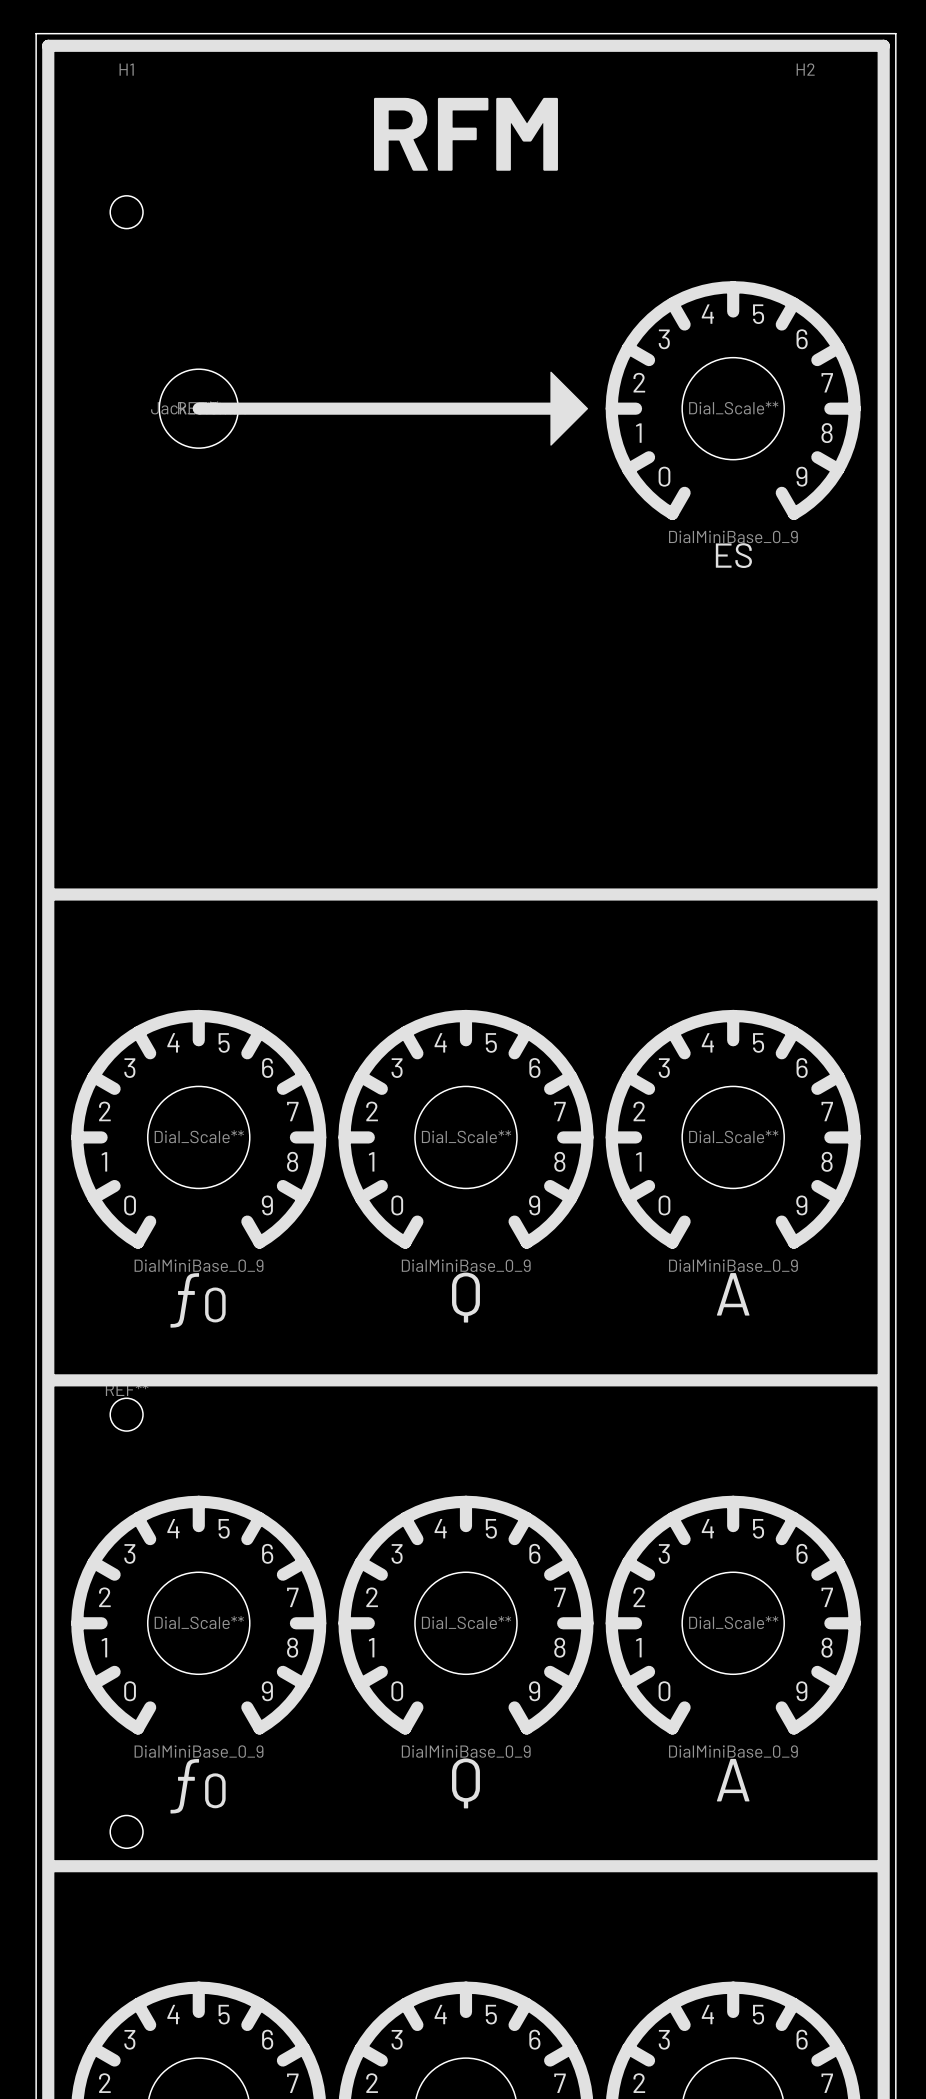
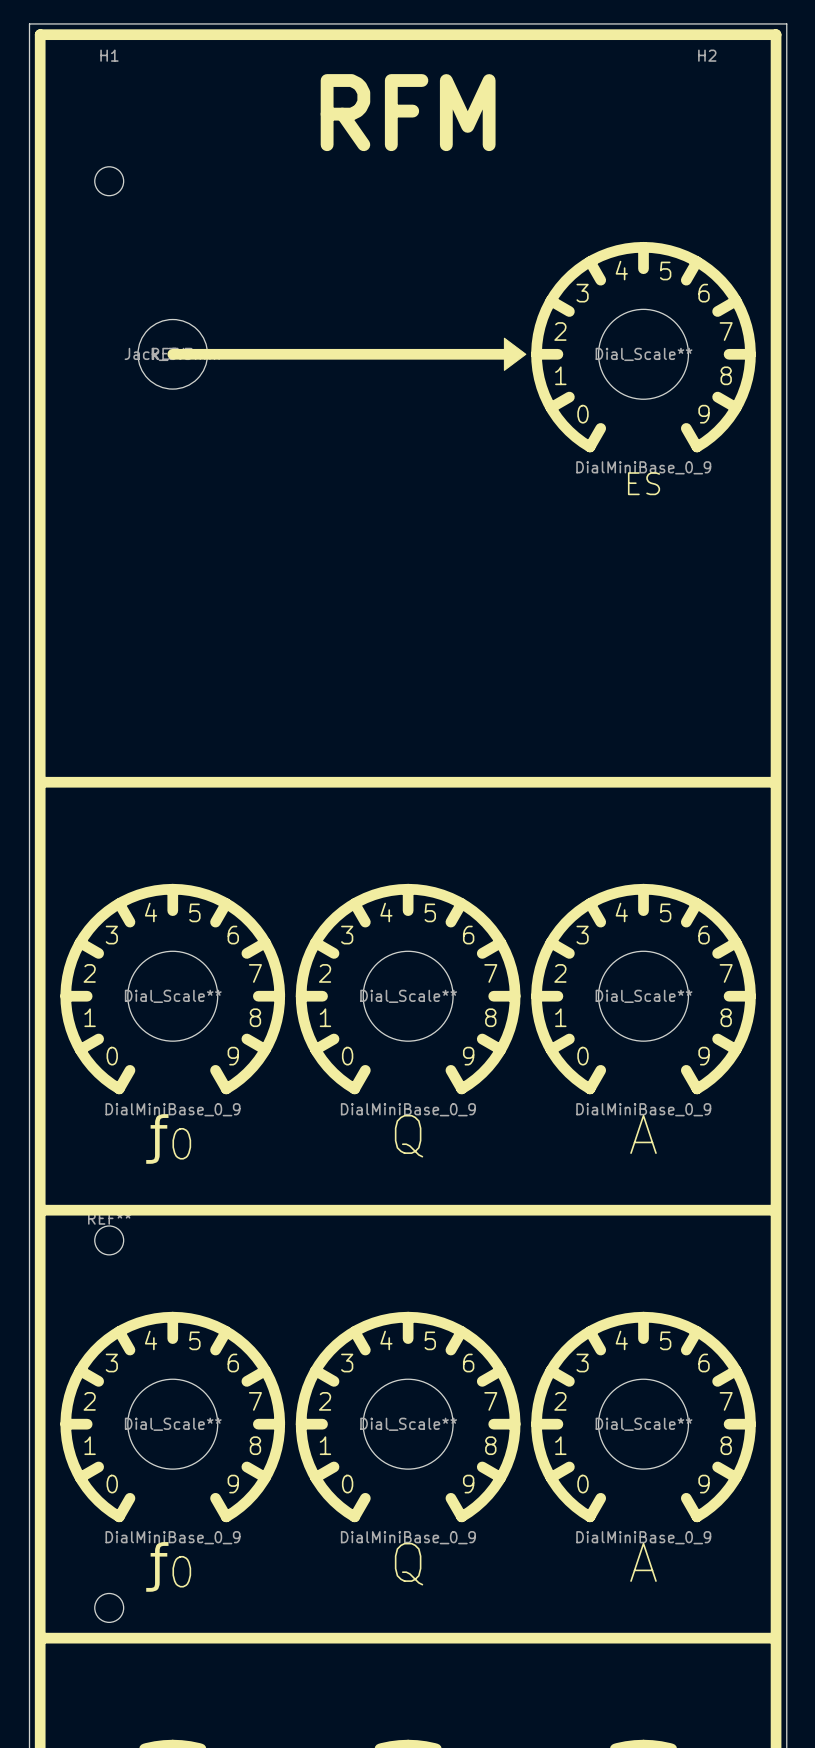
drawing: [550, 371, 589, 446] -> none
drawing: none -> [503, 337, 527, 371]

